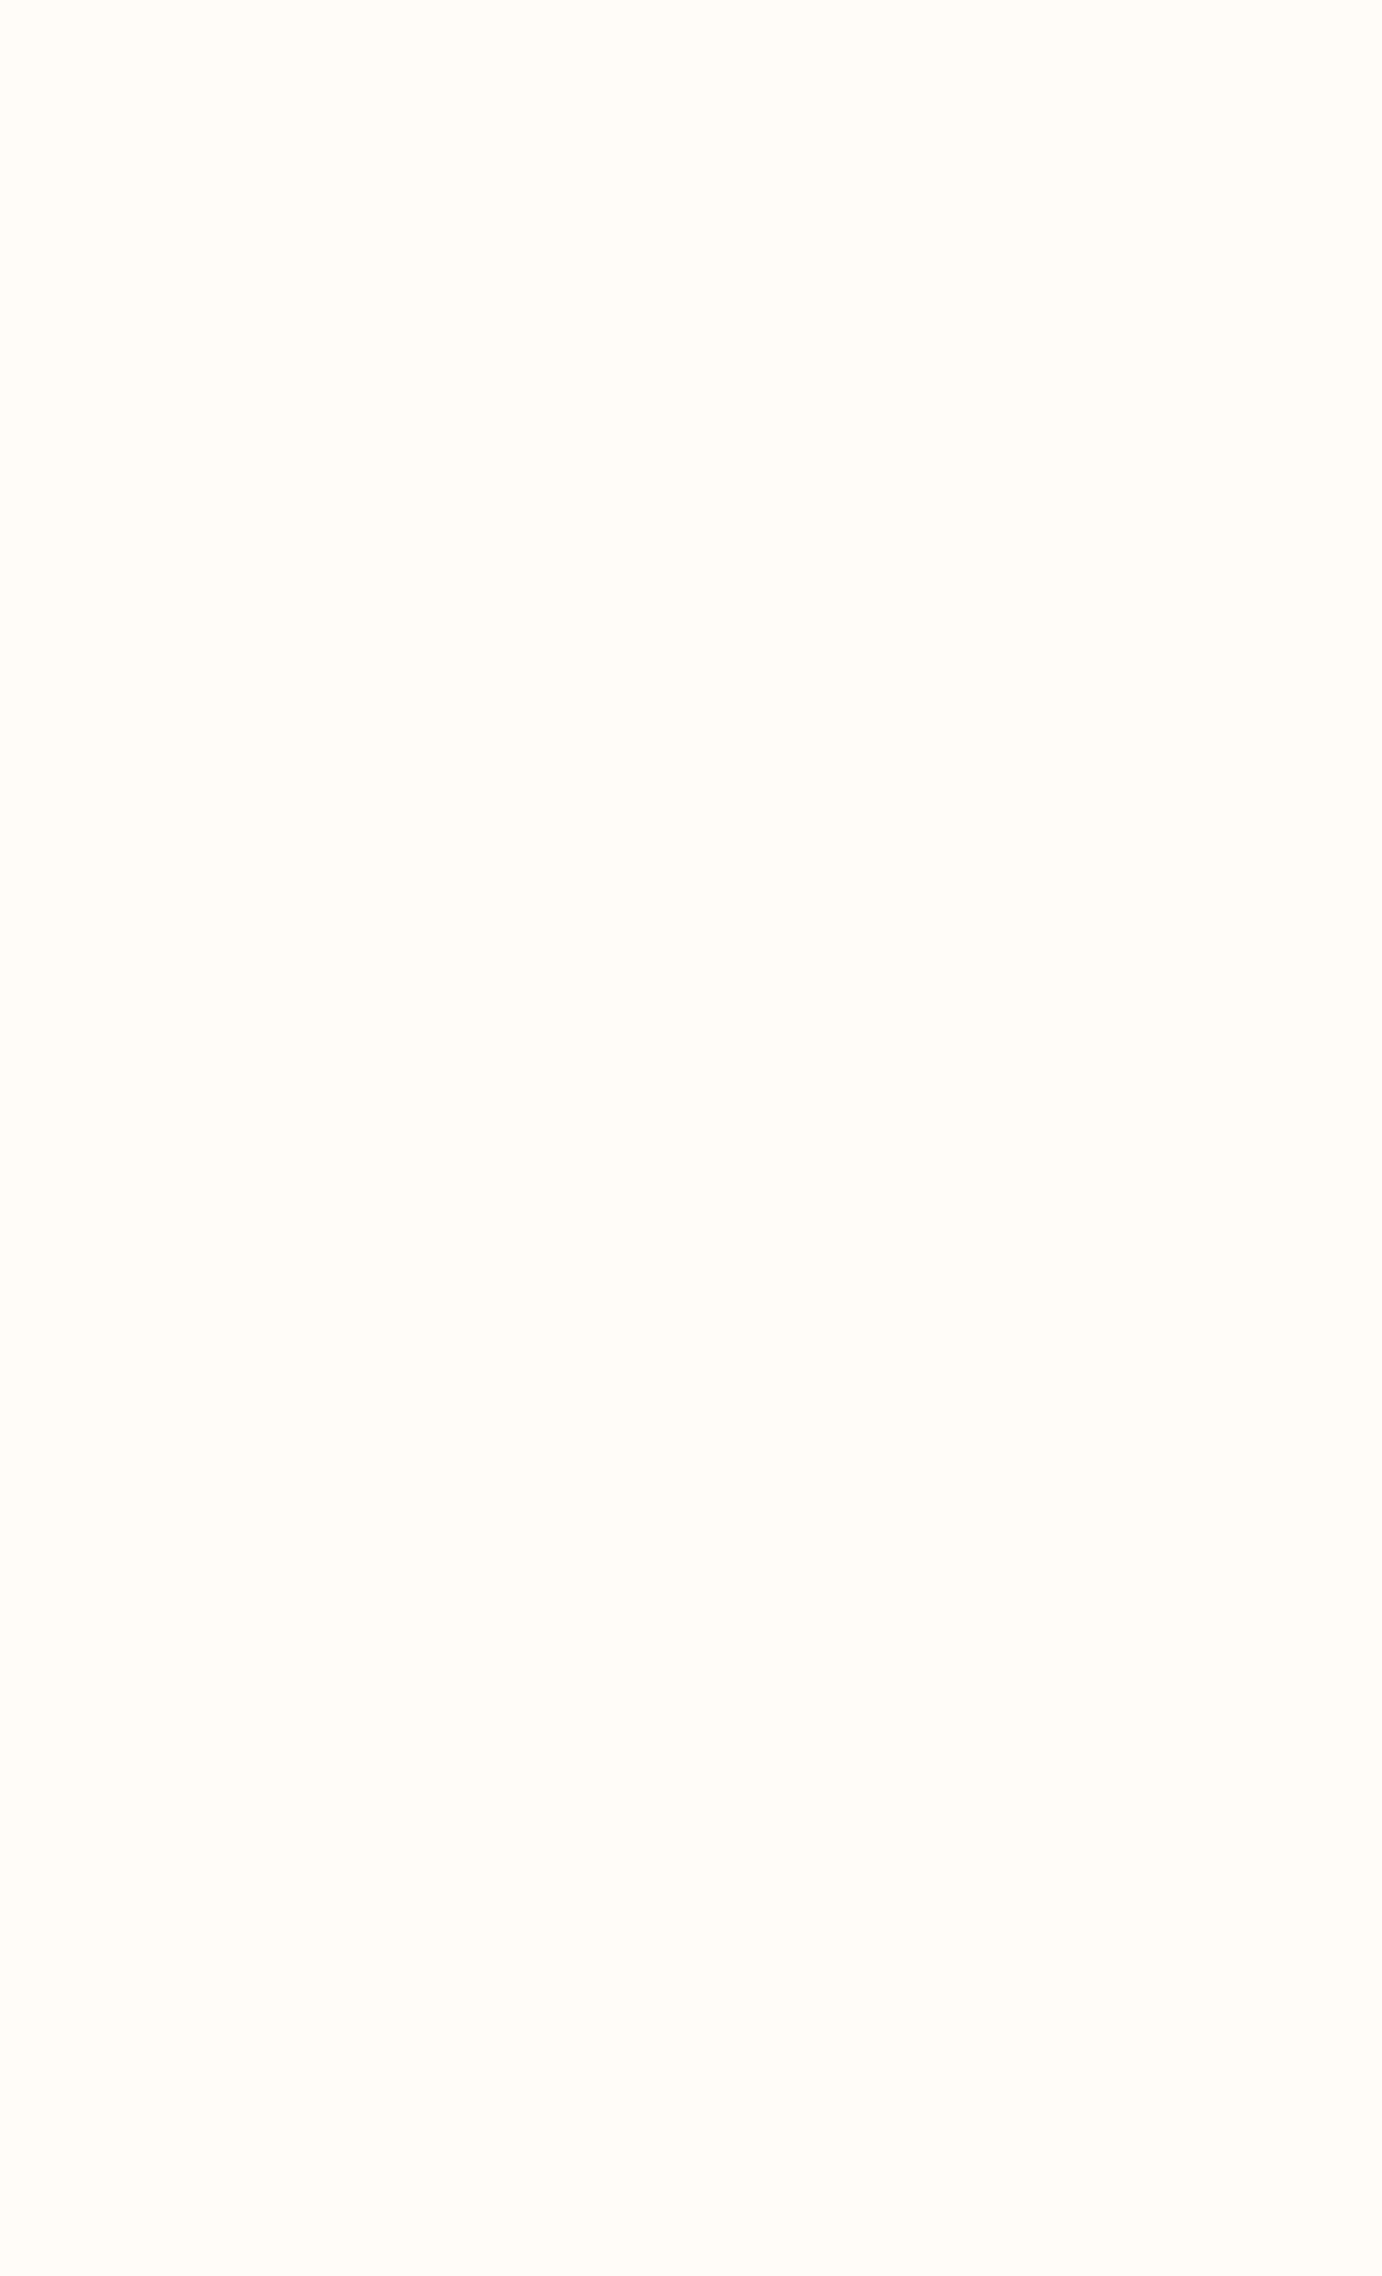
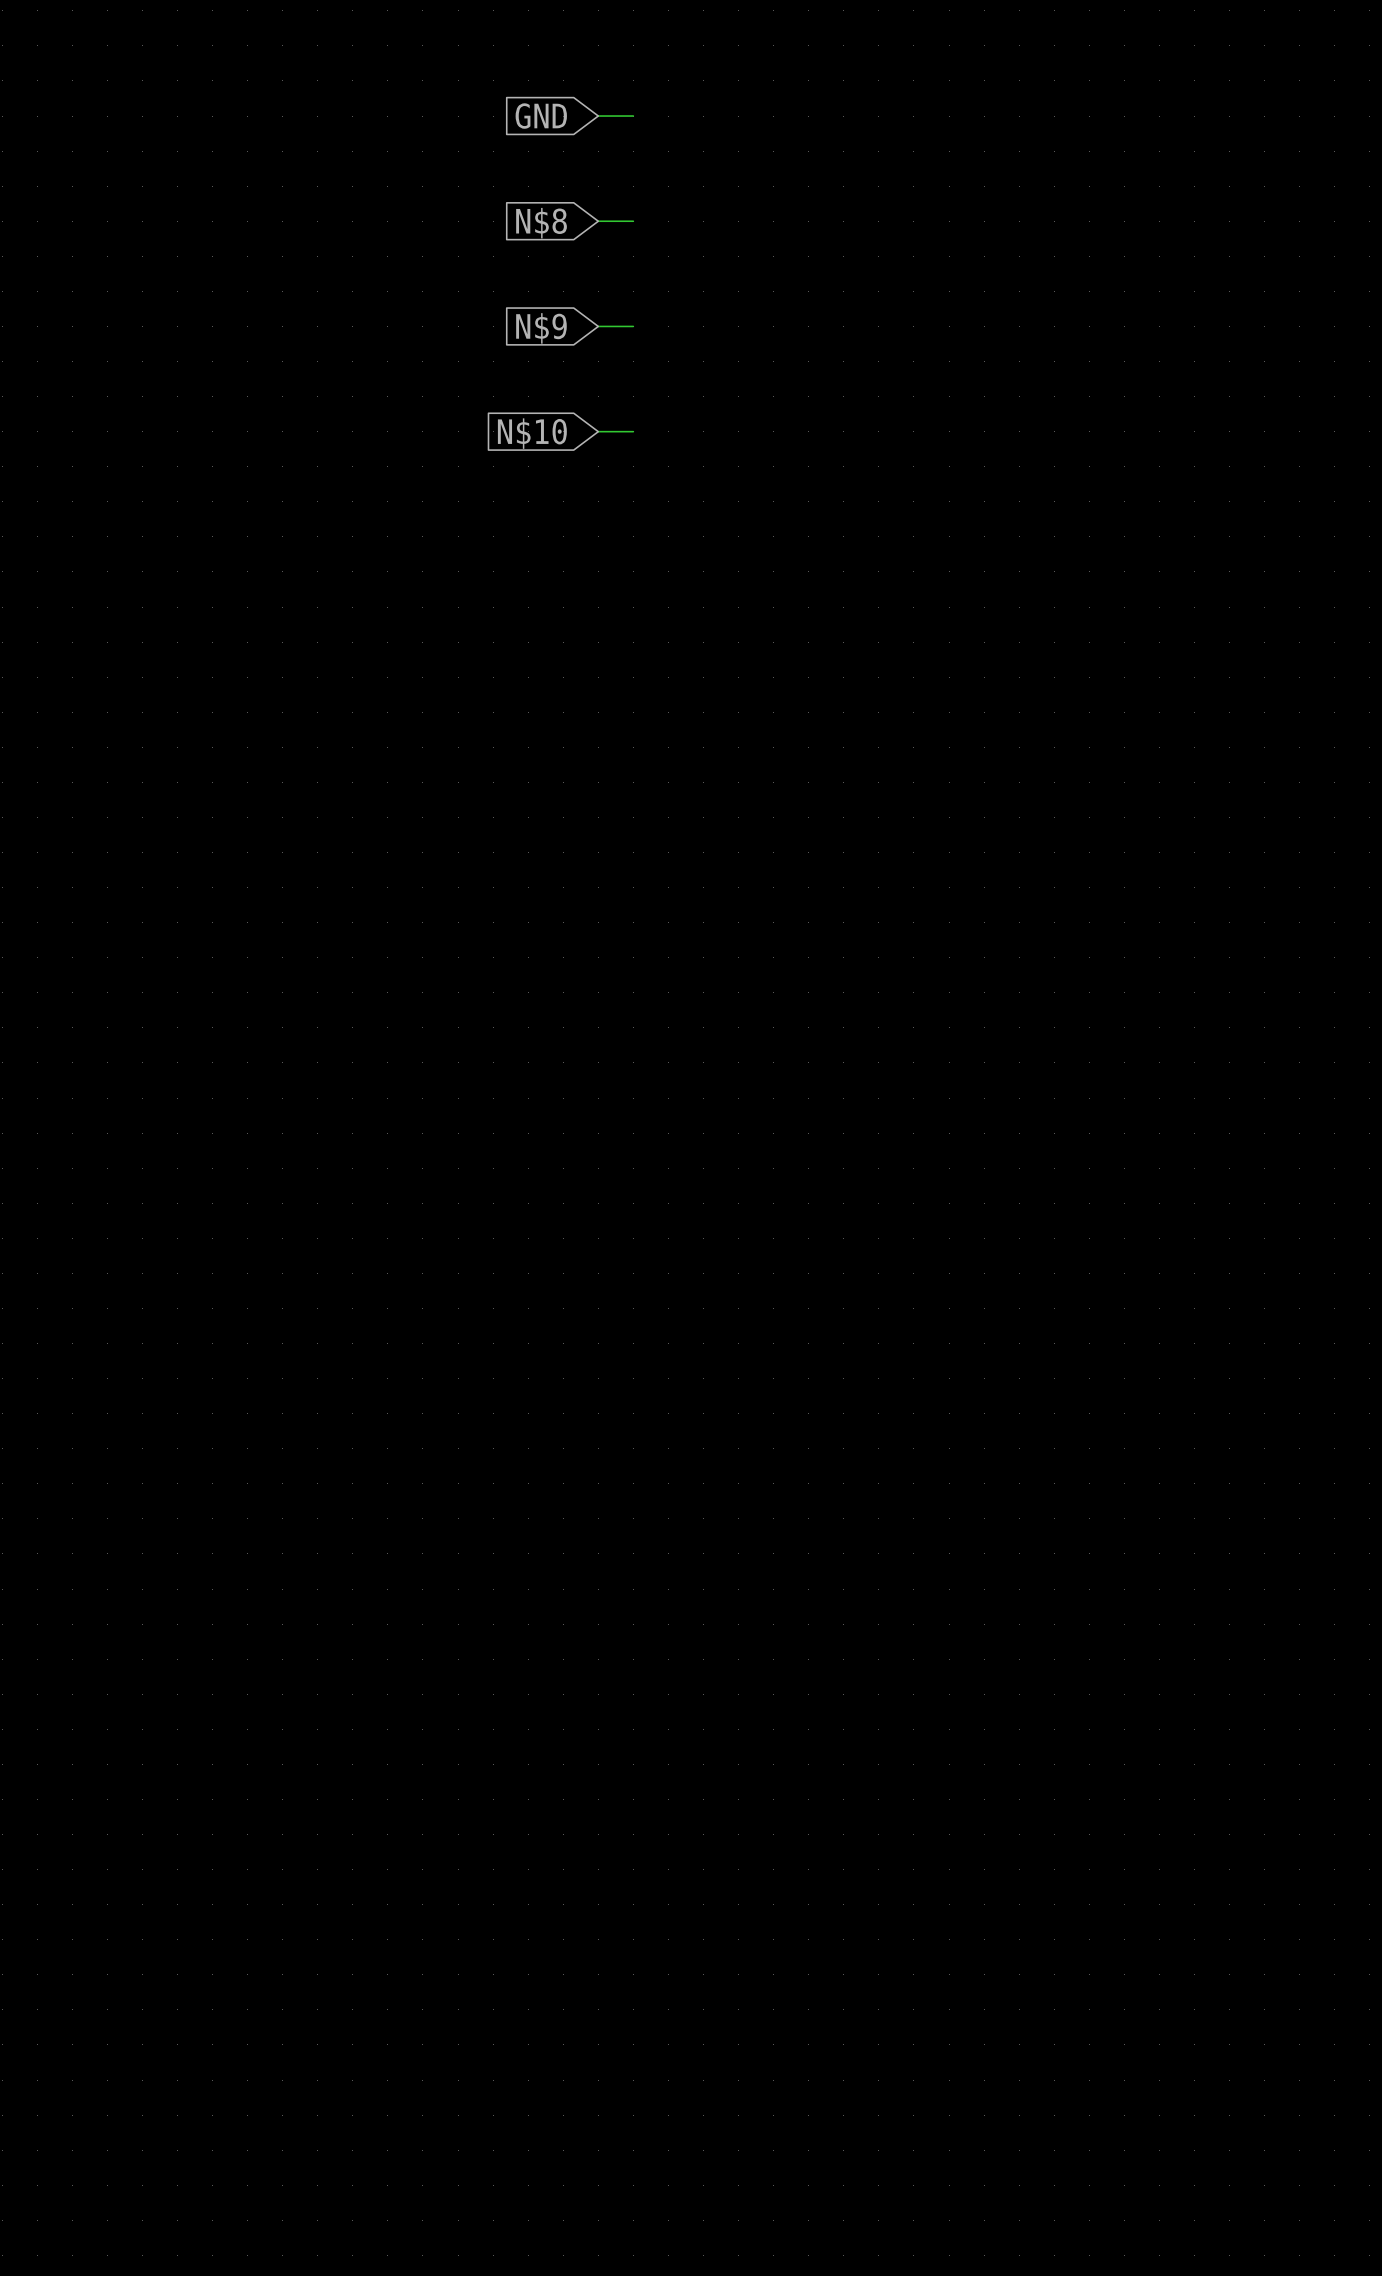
global label: none -> GND (541, 116)
wire: none -> (598, 116) (633, 116)
global label: none -> N$8 (541, 223)
wire: none -> (598, 221) (633, 221)
global label: none -> N$9 (541, 328)
wire: none -> (598, 326) (633, 326)
global label: none -> N$10 (532, 433)
wire: none -> (598, 431) (633, 431)

